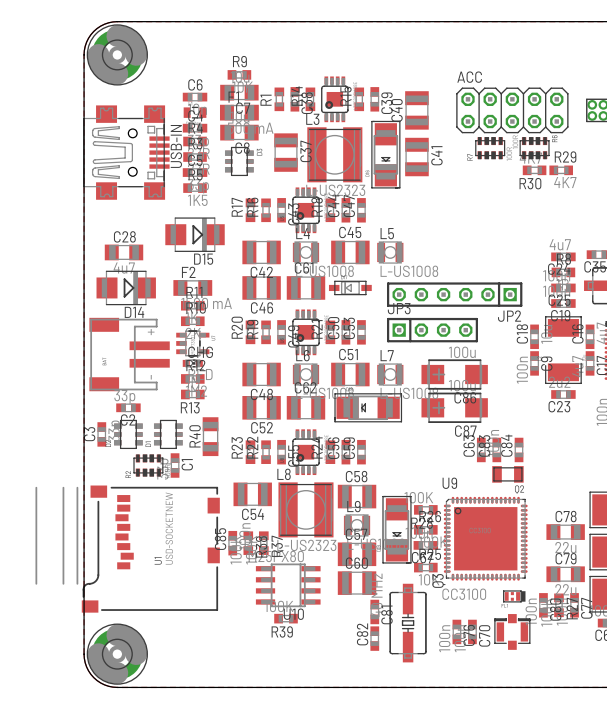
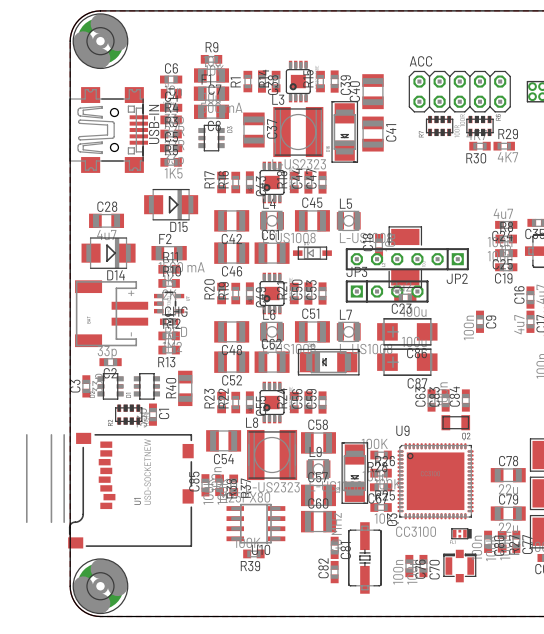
C18 position: (534, 336) -> (379, 245)
part position: (563, 350) -> (405, 257)
C23 position: (563, 394) -> (405, 297)

